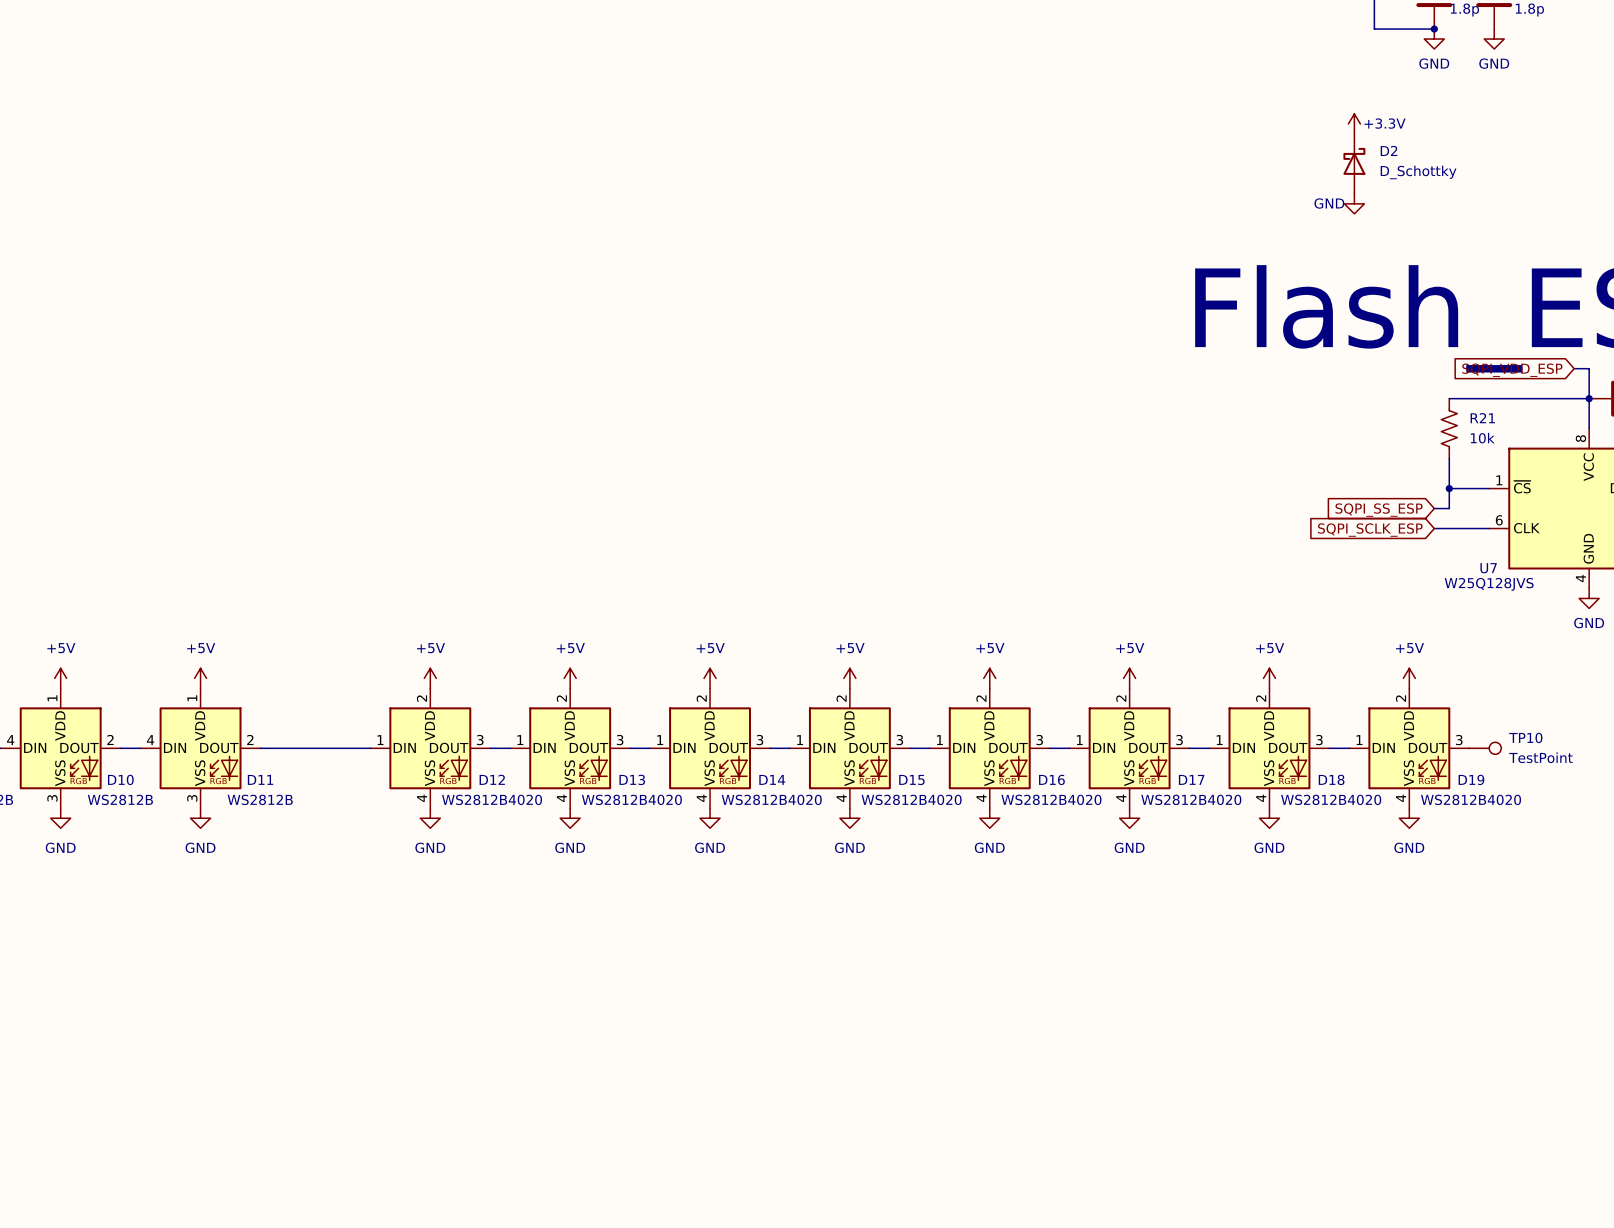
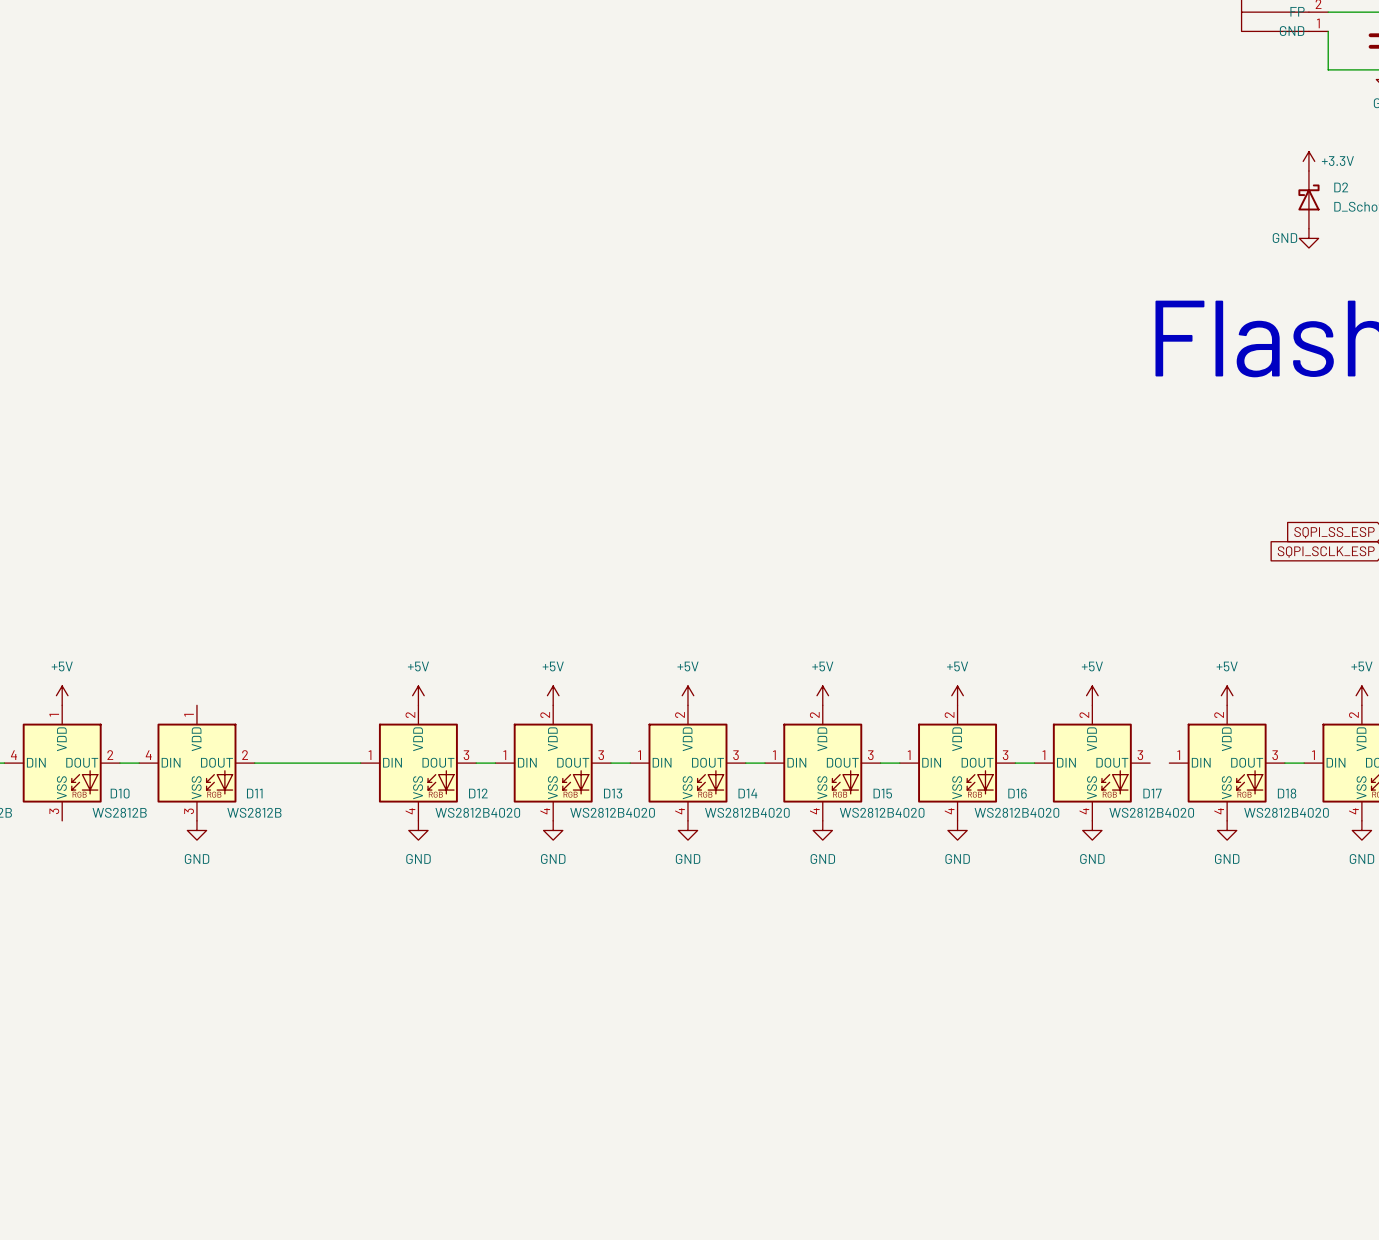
power symbol: +5V (200, 678) -> none
wire: (1189, 748) (1209, 748) -> none
power symbol: GND (60, 818) -> none

